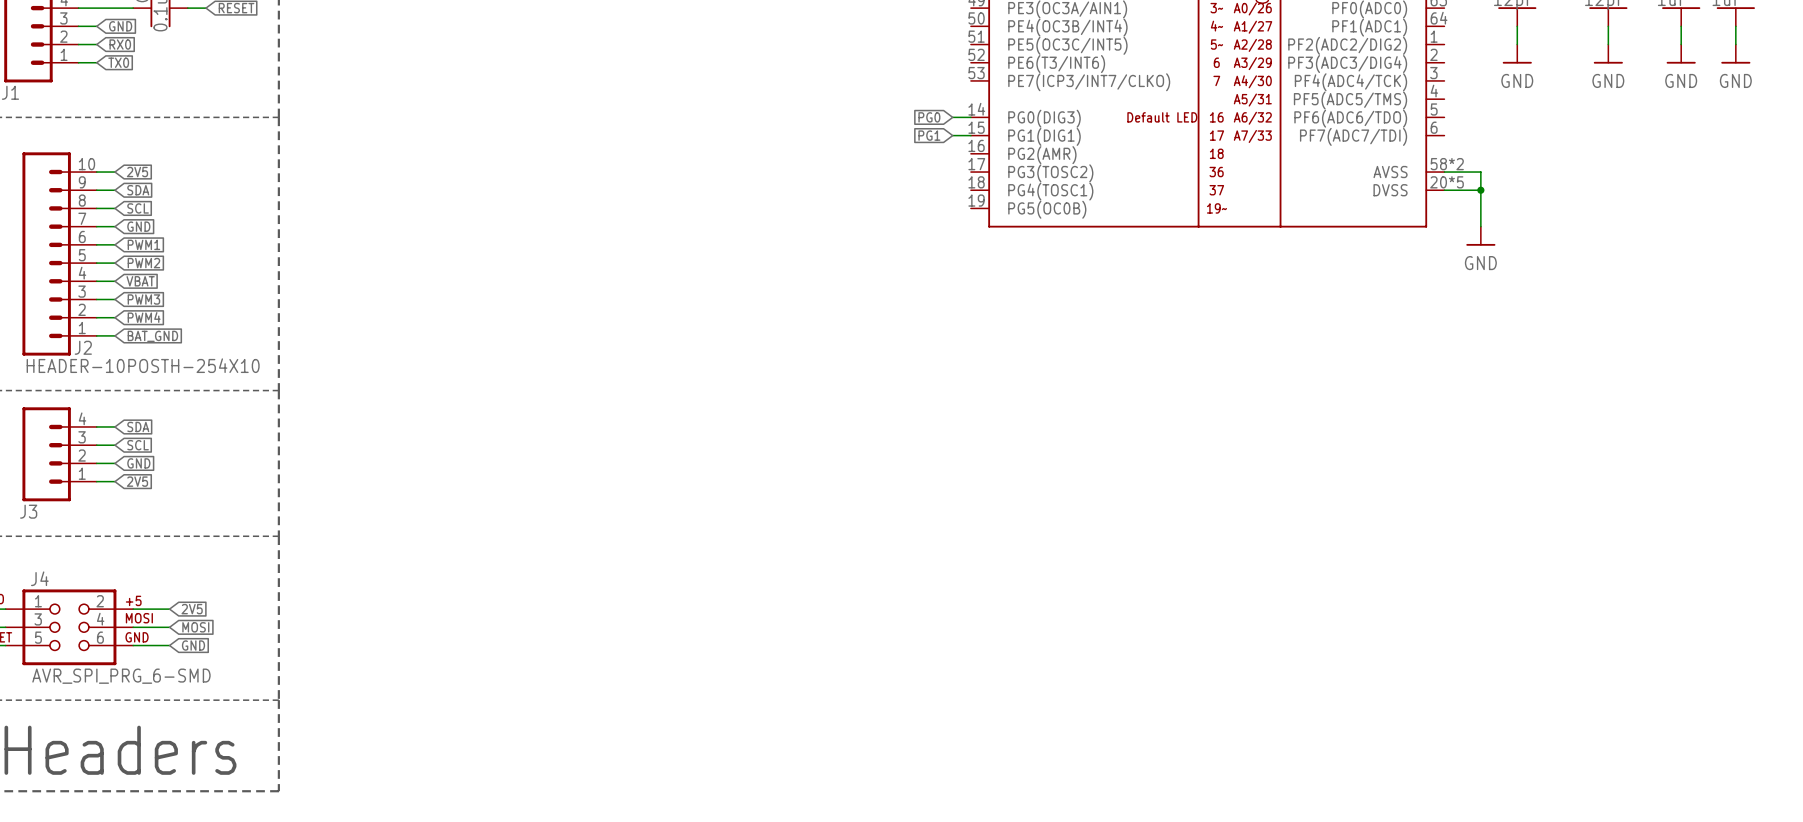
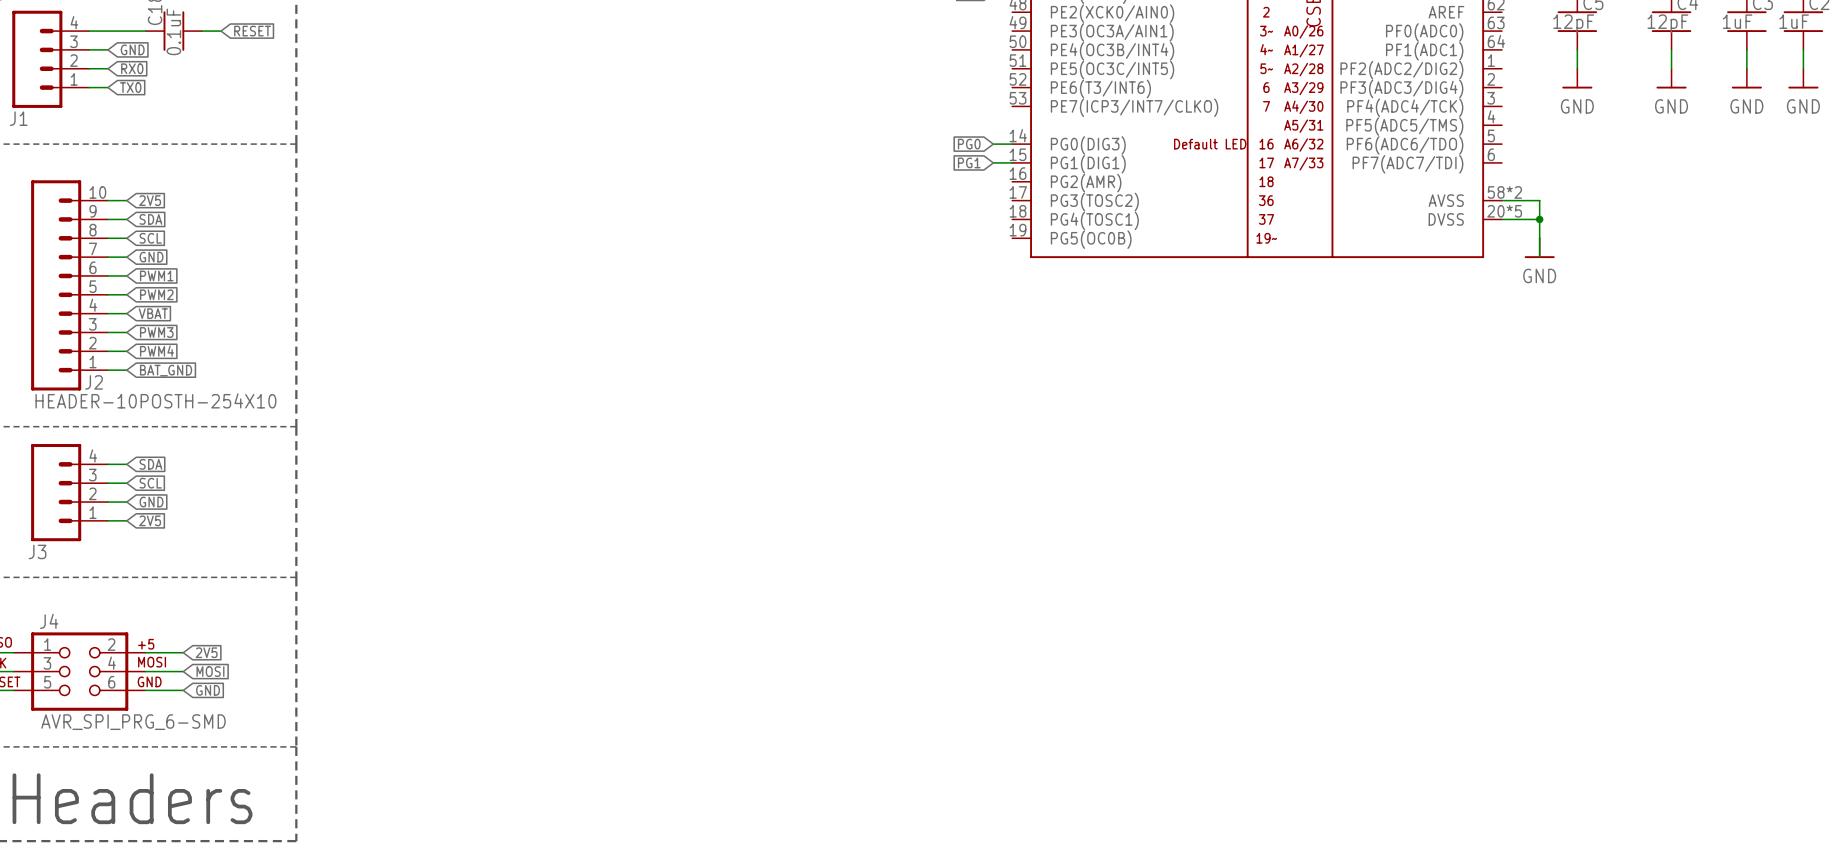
power symbol position: GND (1480, 236) -> GND (1539, 248)

